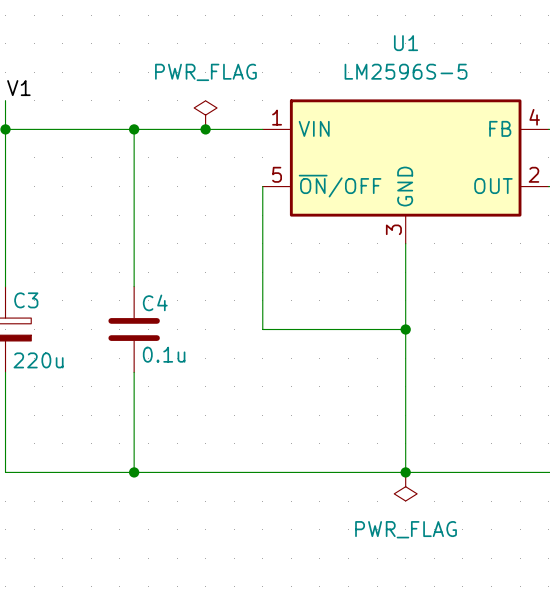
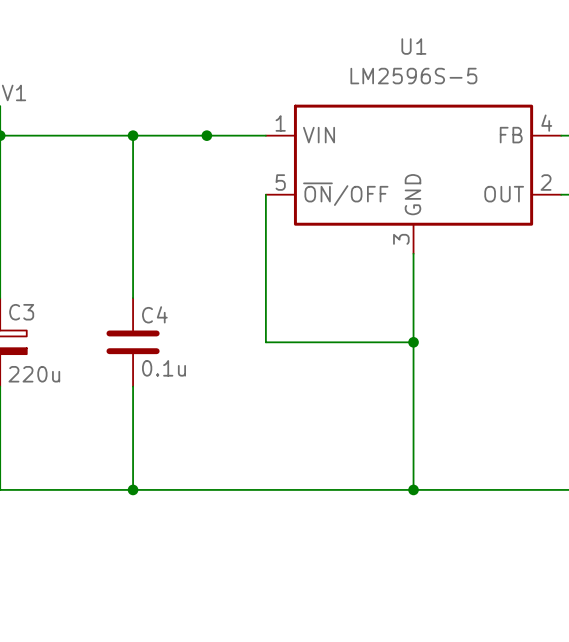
power symbol: PWR_FLAG (205, 115) -> none
power symbol: PWR_FLAG (405, 486) -> none

